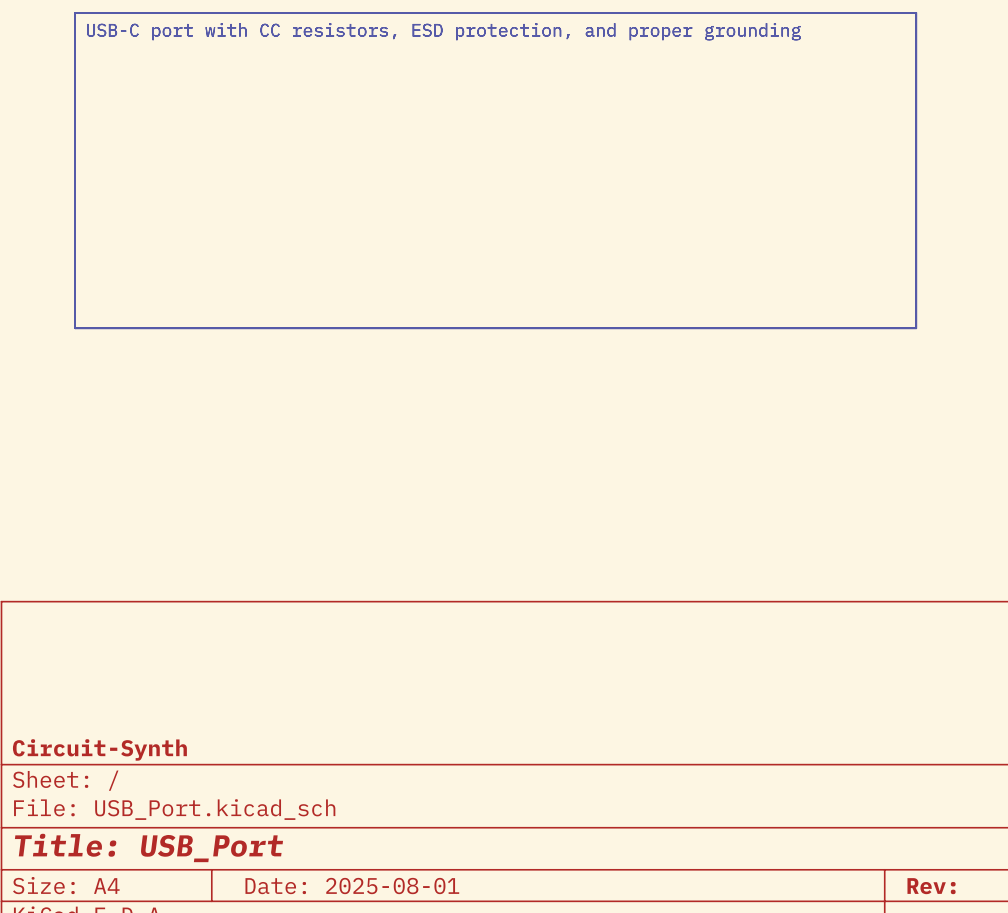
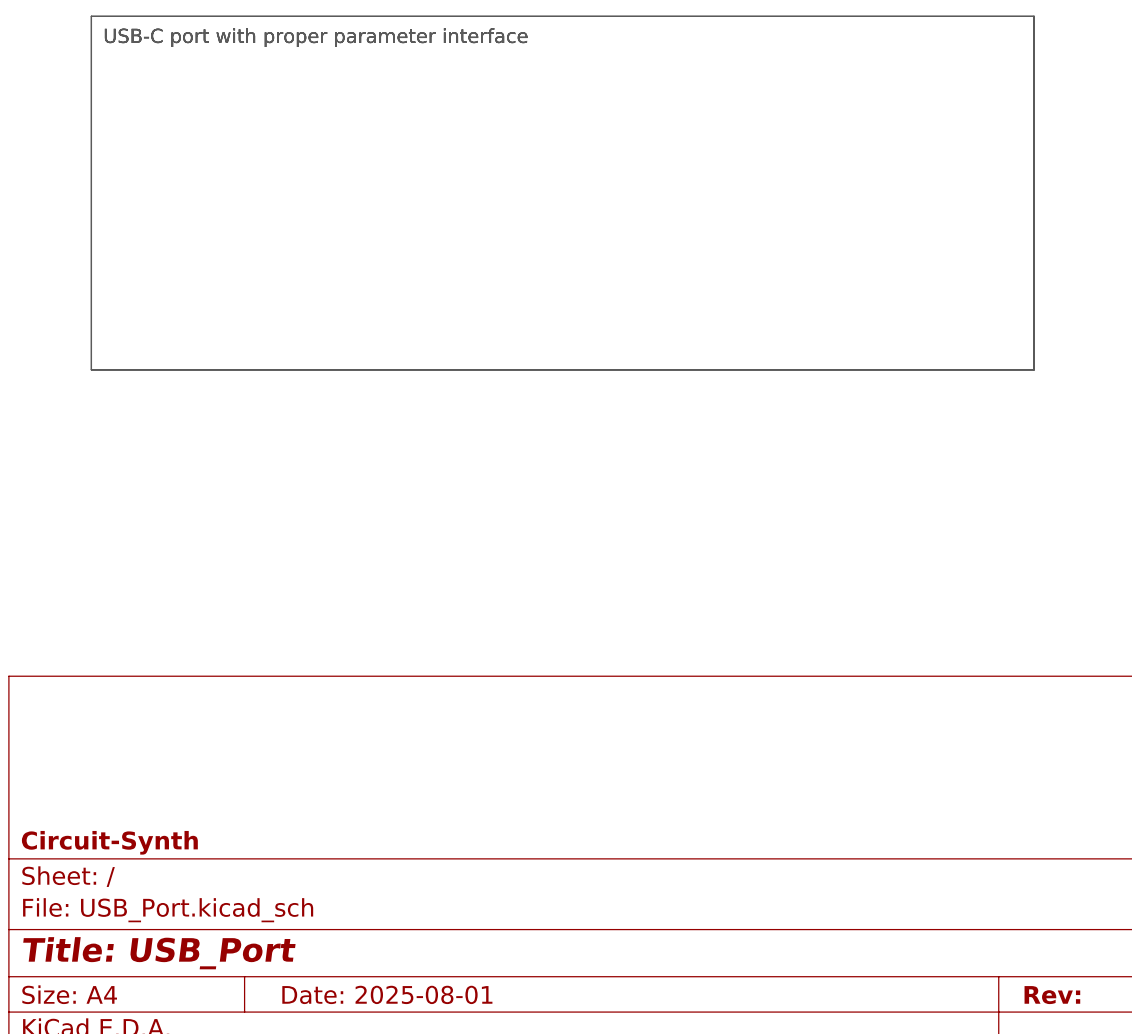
text: USB-C port with CC resistors, ESD protection, and proper grounding (443, 31) -> USB-C port with proper parameter interface (316, 37)

